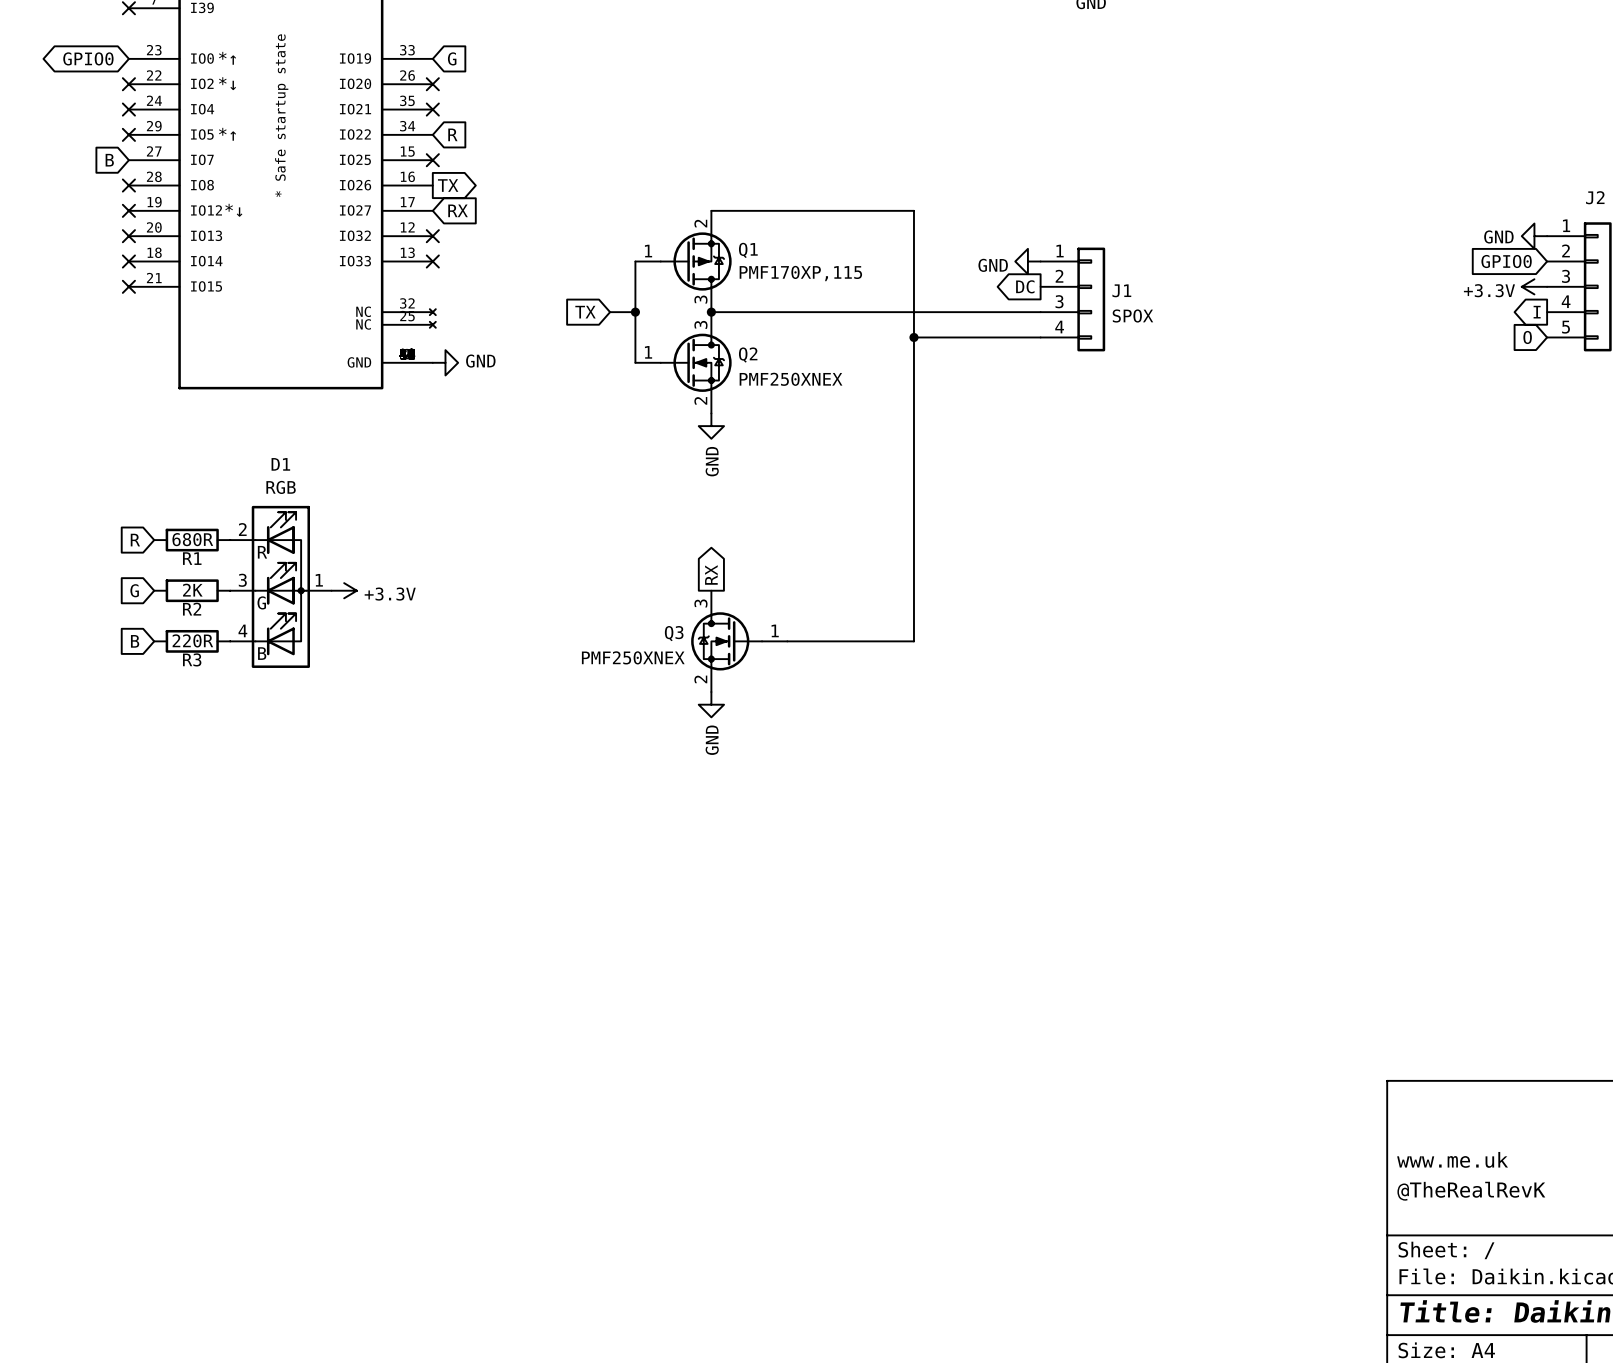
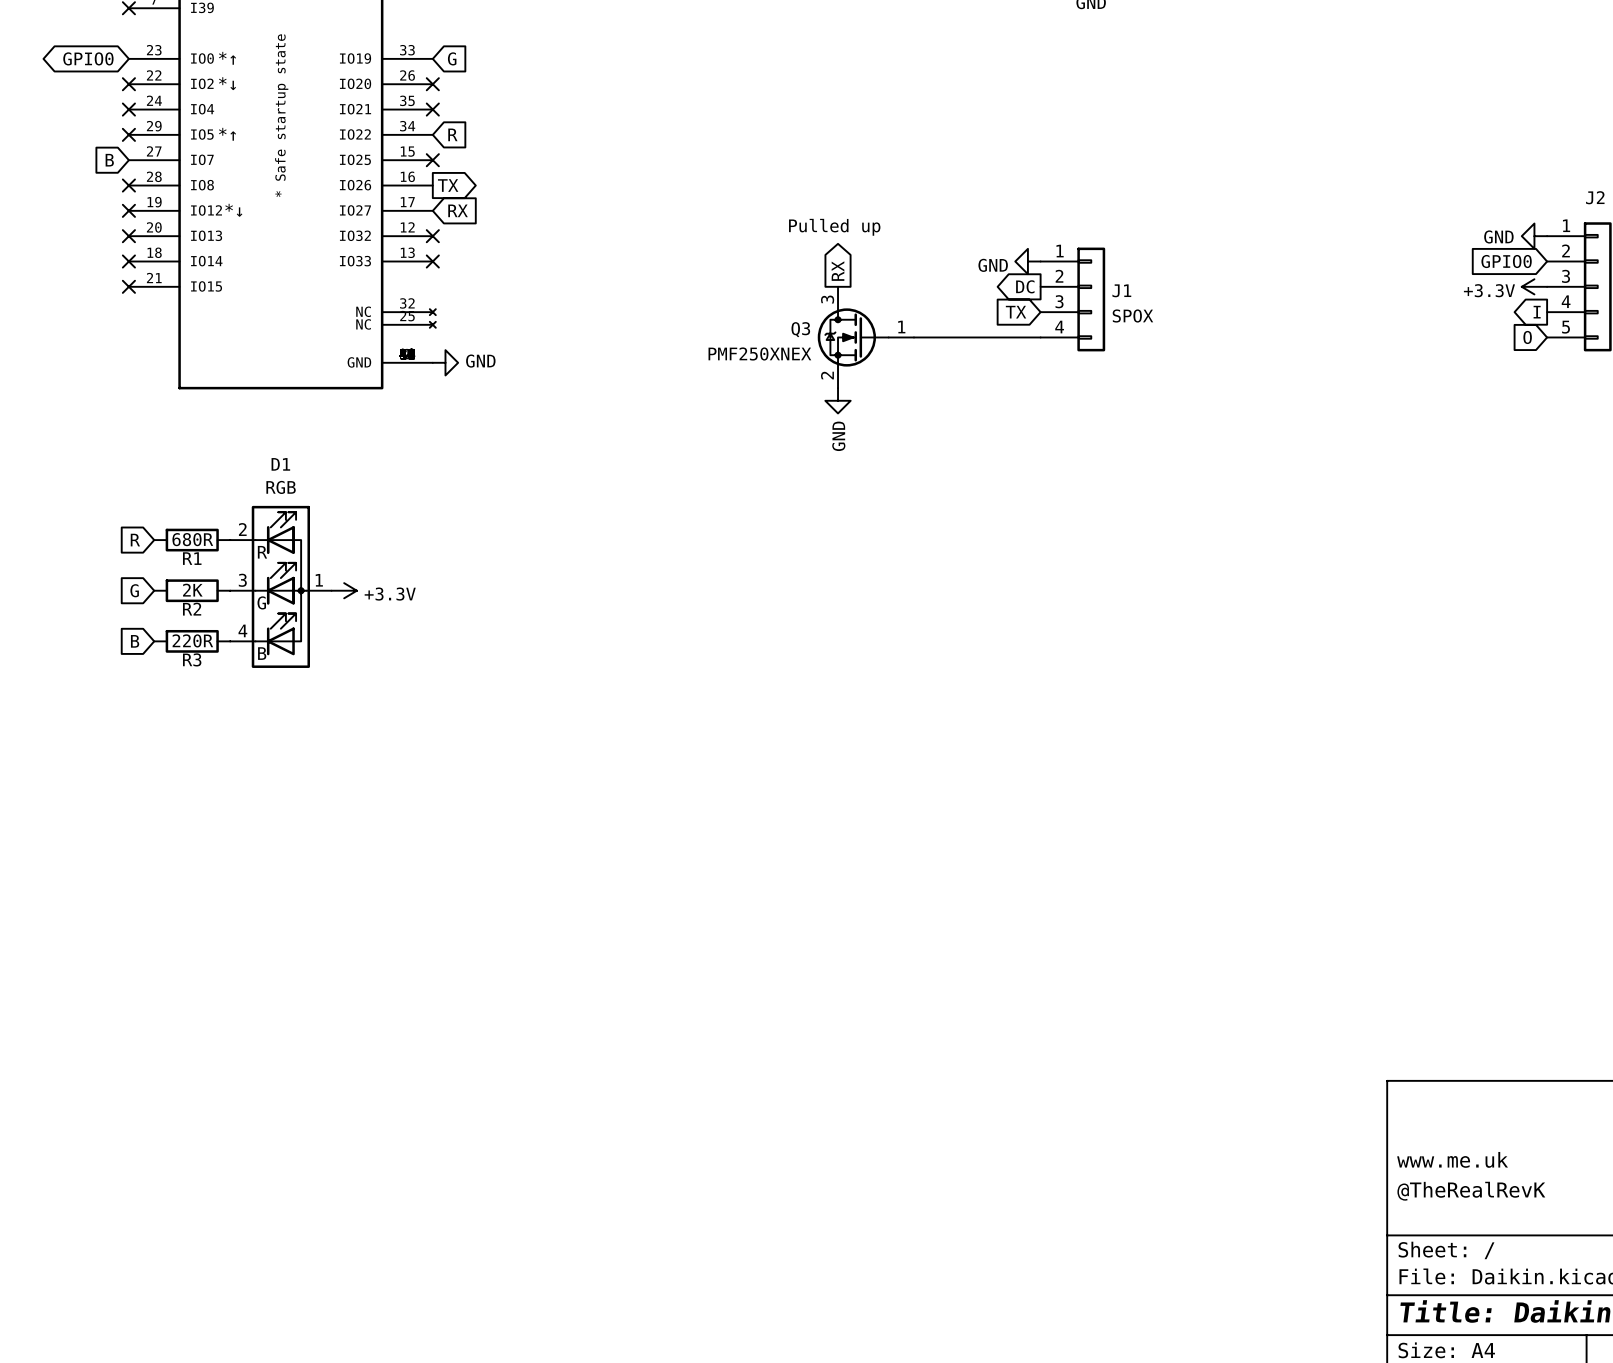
wire: (711, 210) (913, 210) (913, 641) (787, 641) -> none
text: none -> Pulled up (834, 227)
wire: (635, 261) (635, 362) -> none
Q1: PMF170XP,115 (683, 261) -> none
global label: none -> RX (838, 271)
global label: TX (585, 312) -> none
wire: (610, 312) (635, 312) -> none
junction: (635, 312) -> none
wire: (711, 312) (1040, 312) -> none
junction: (711, 312) -> none
global label: none -> TX (1016, 312)
junction: (913, 337) -> none
Q2: PMF250XNEX (683, 362) -> none
power symbol position: GND (711, 426) -> GND (838, 400)
global label: RX (711, 574) -> none
Q3 position: (739, 641) -> (865, 337)
power symbol: GND (711, 704) -> none

